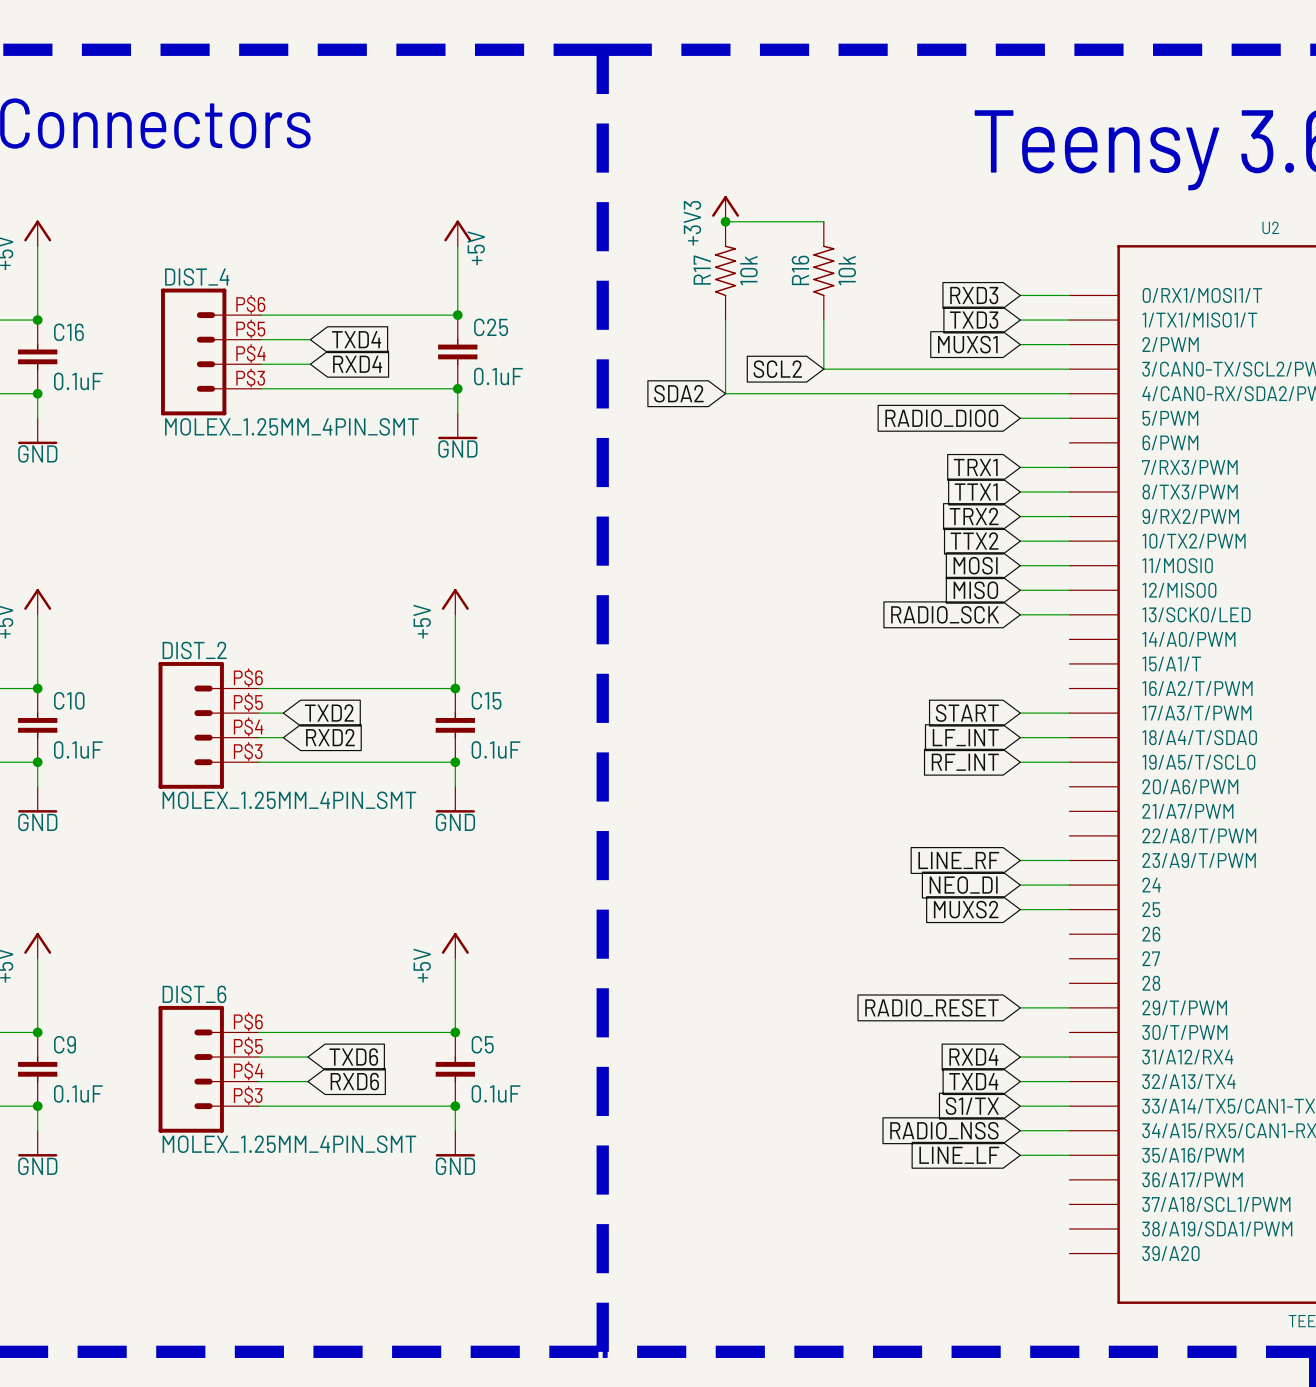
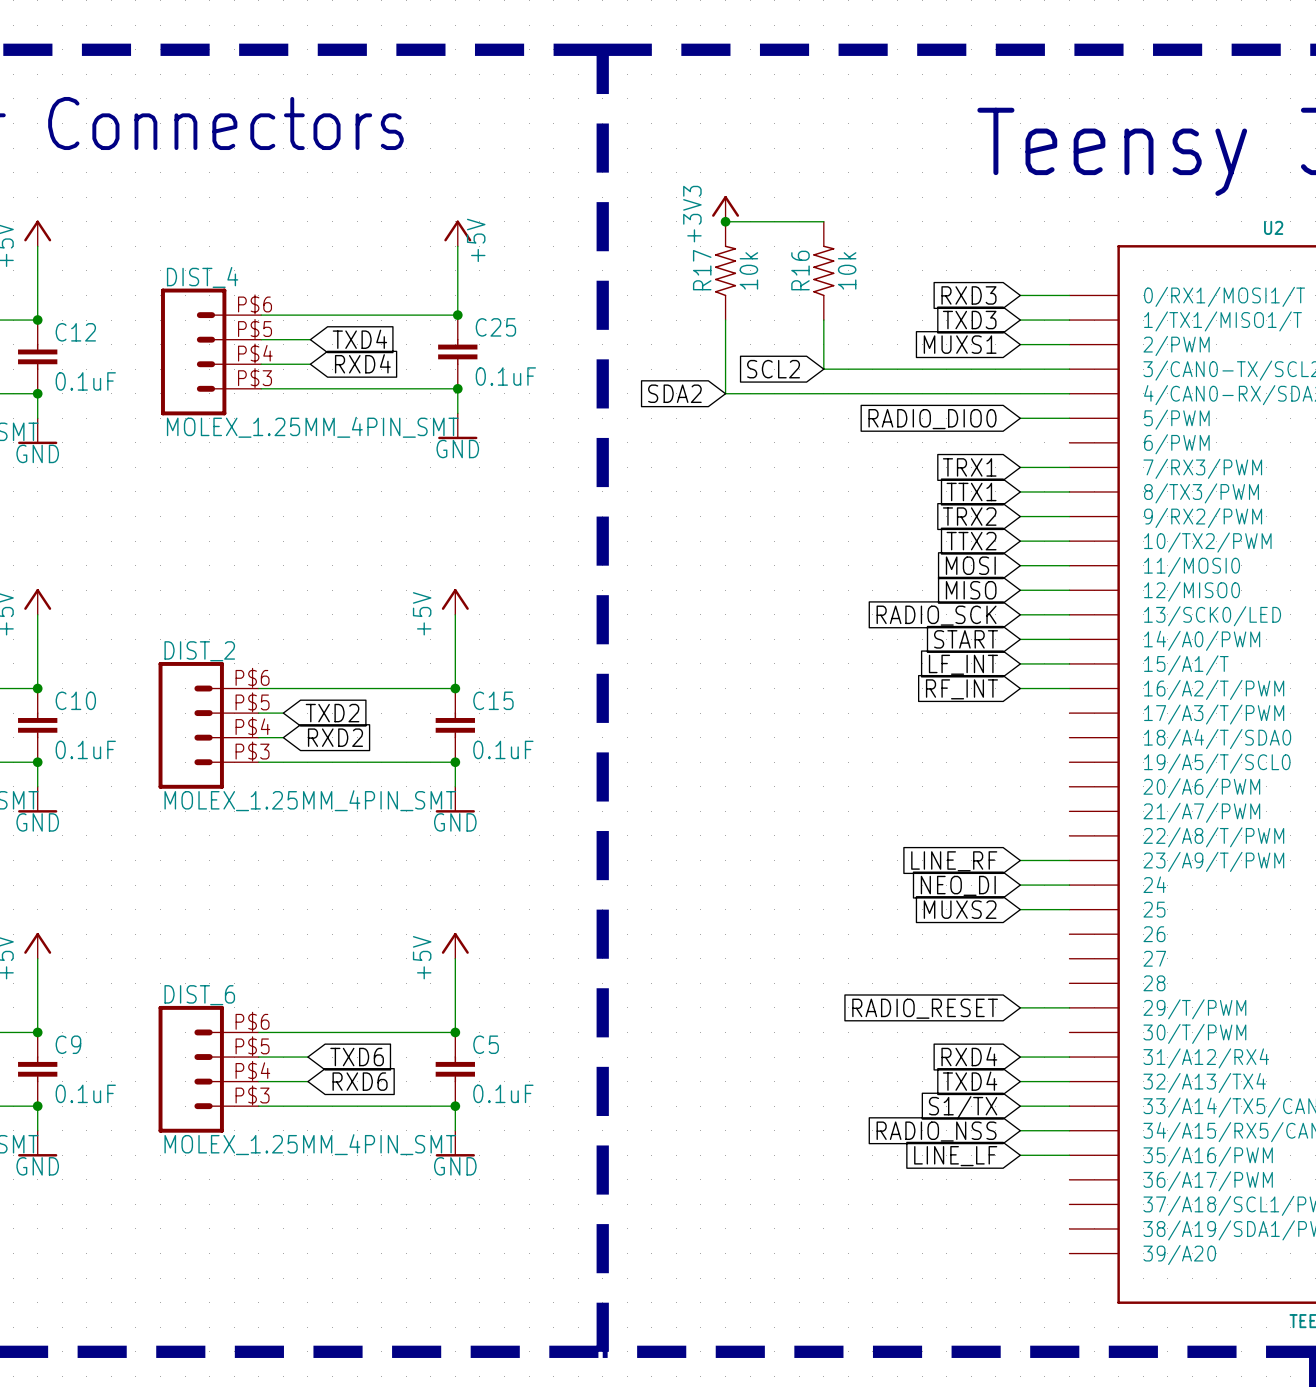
C16 name: C16 (68, 332) -> C12 (75, 332)
global label position: START (967, 713) -> START (966, 639)
wire: (1020, 713) (1069, 713) -> (1020, 639) (1069, 639)
global label position: LF_INT (965, 737) -> LF_INT (963, 664)
wire: (1020, 737) (1069, 737) -> (1020, 663) (1069, 663)
global label position: RF_INT (965, 762) -> RF_INT (961, 689)
wire: (1020, 762) (1069, 762) -> (1020, 688) (1069, 688)

